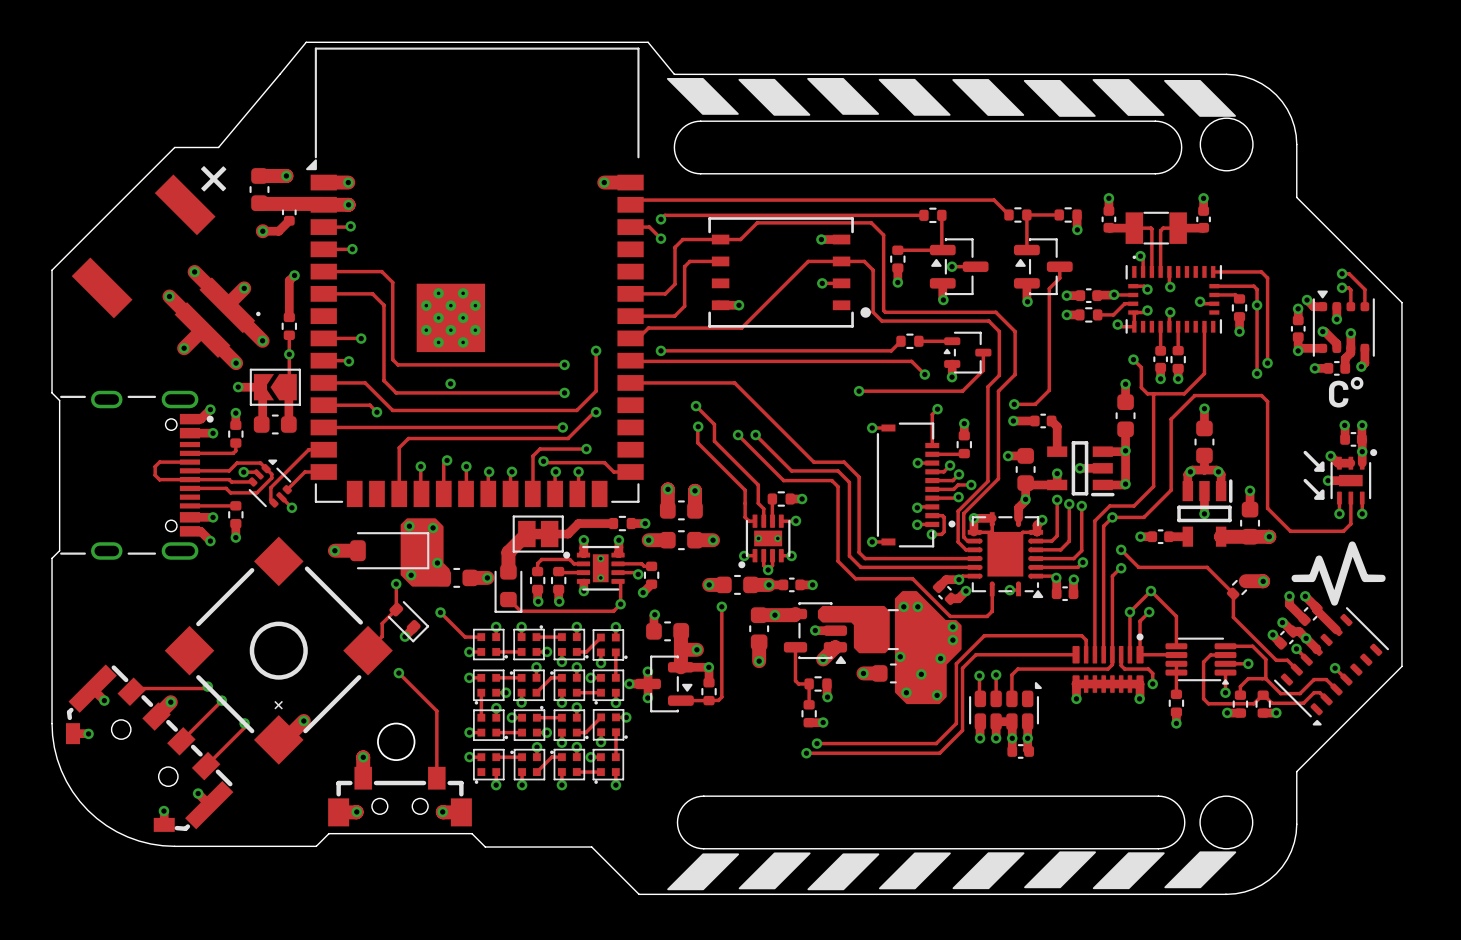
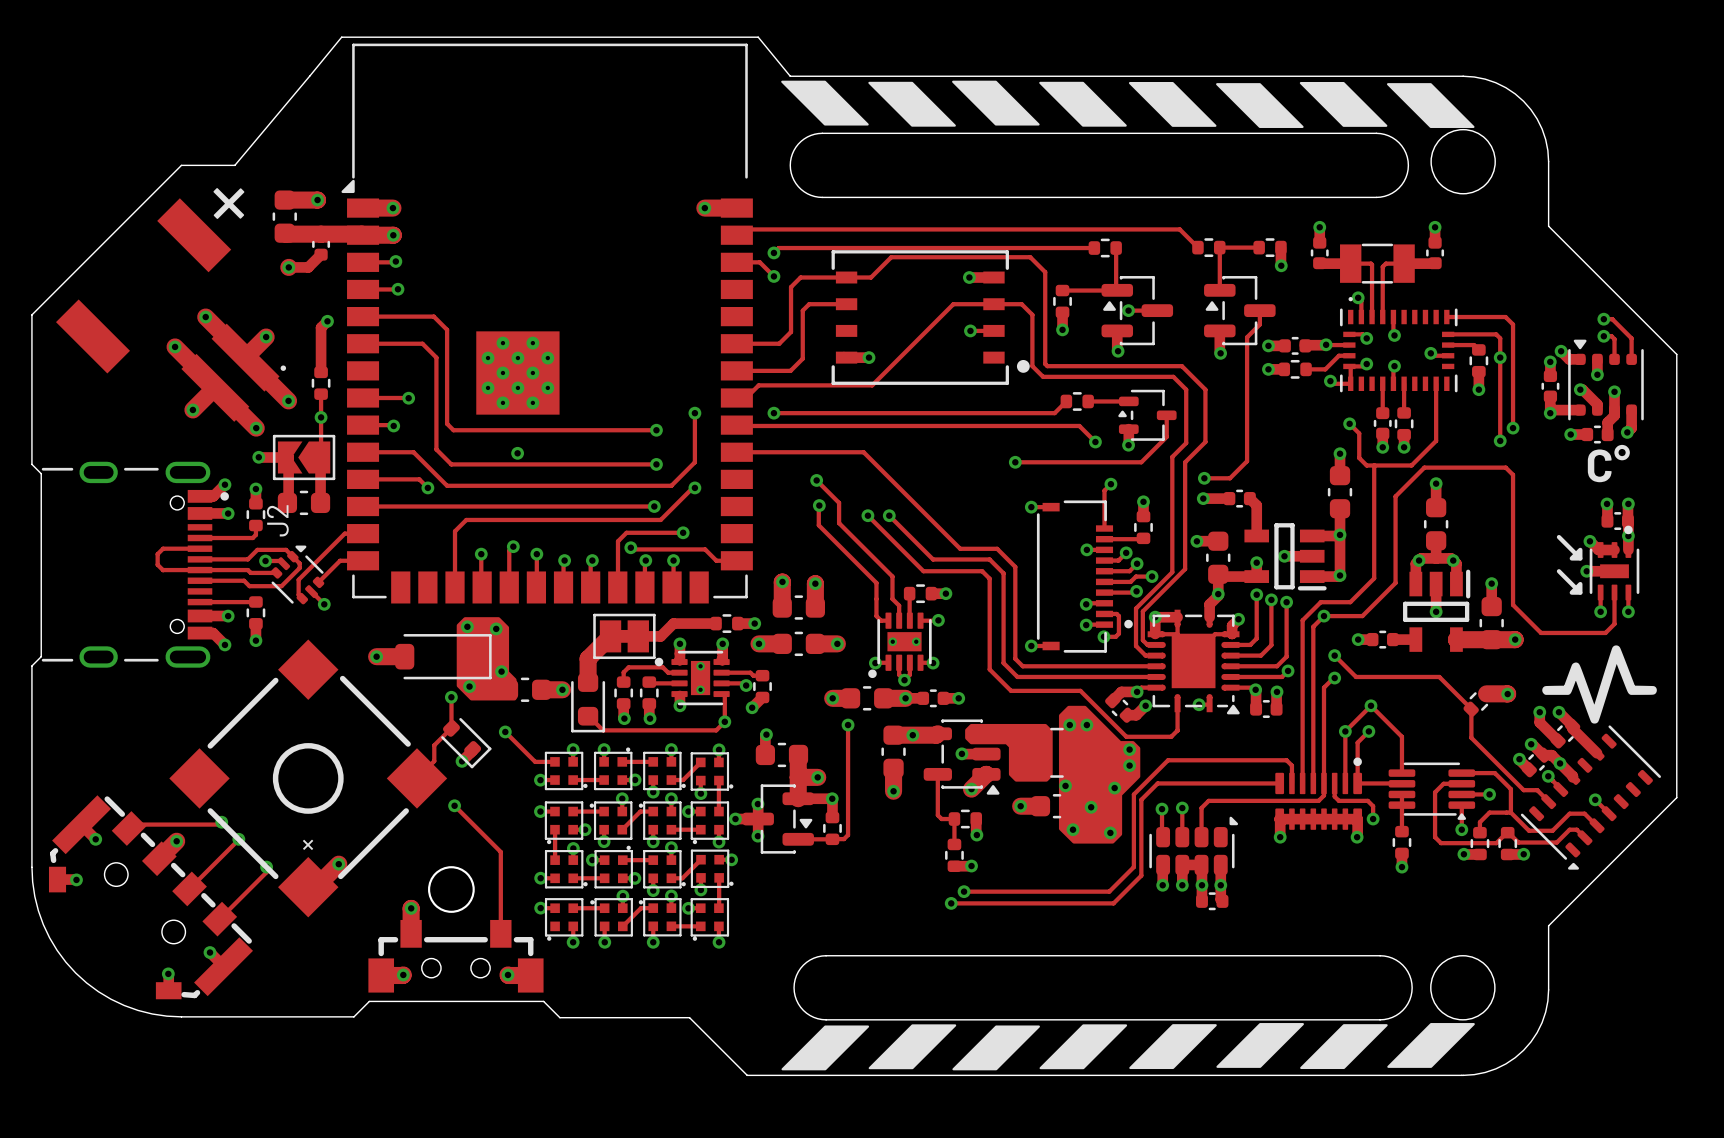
J2 name: none -> J2 (277, 520)
part footprint: [1330, 449, 1378, 505] -> [1589, 525, 1640, 601]

